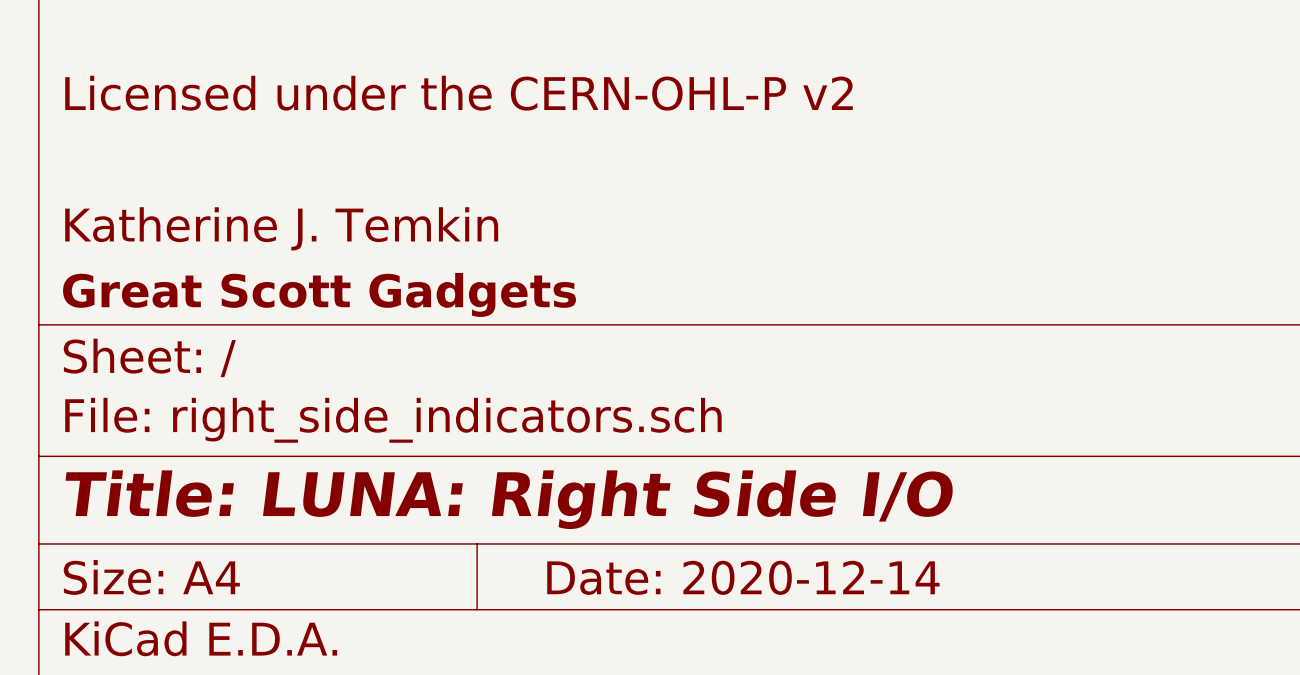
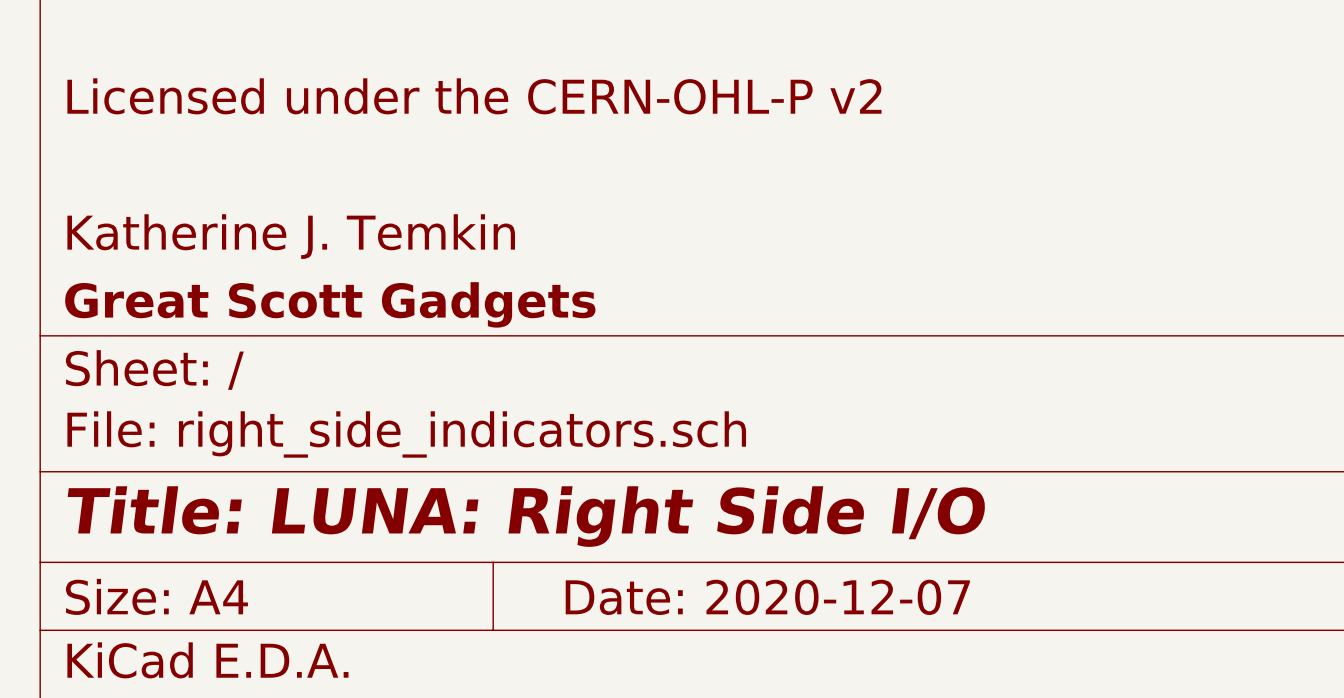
title block: Date: 2020-12-14 (743, 577) -> Date: 2020-12-07 (767, 597)

